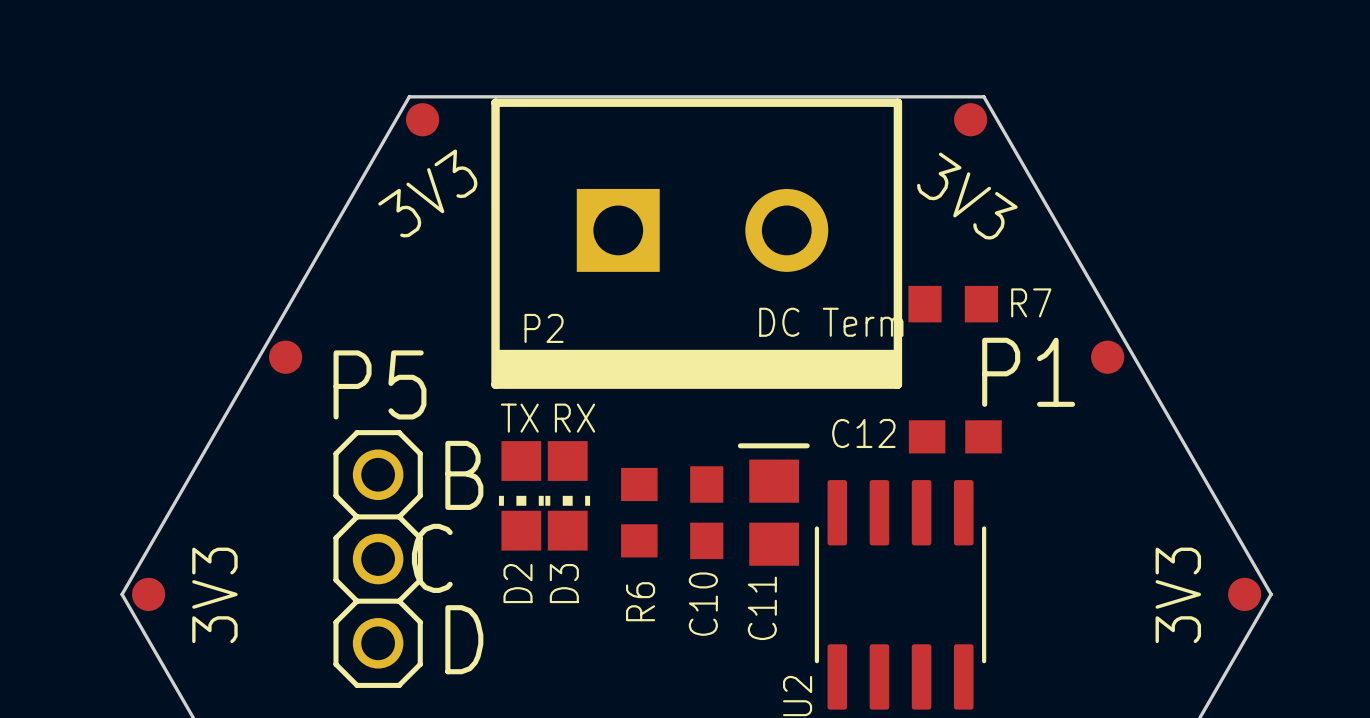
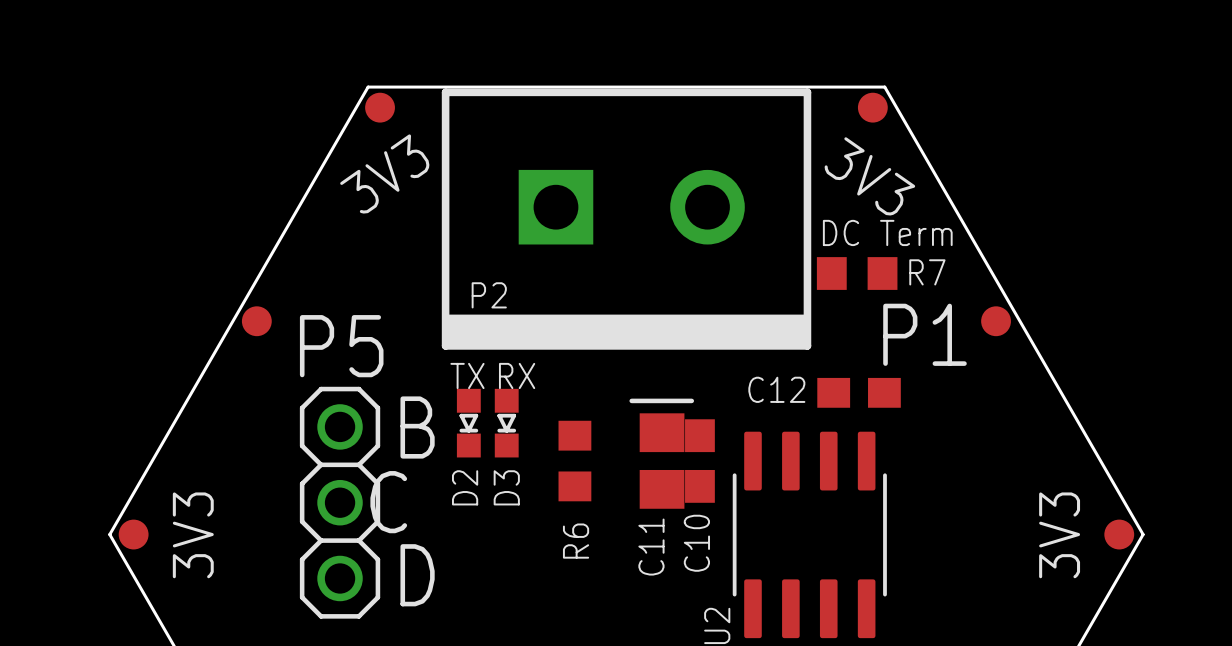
text position: DC Term (831, 322) -> DC Term (887, 232)
D2 footprint: [498, 441, 544, 551] -> [456, 388, 481, 458]
D3 footprint: [545, 441, 591, 551] -> [494, 388, 519, 458]
C11 position: (773, 504) -> (661, 453)
C10 position: (706, 512) -> (699, 461)

